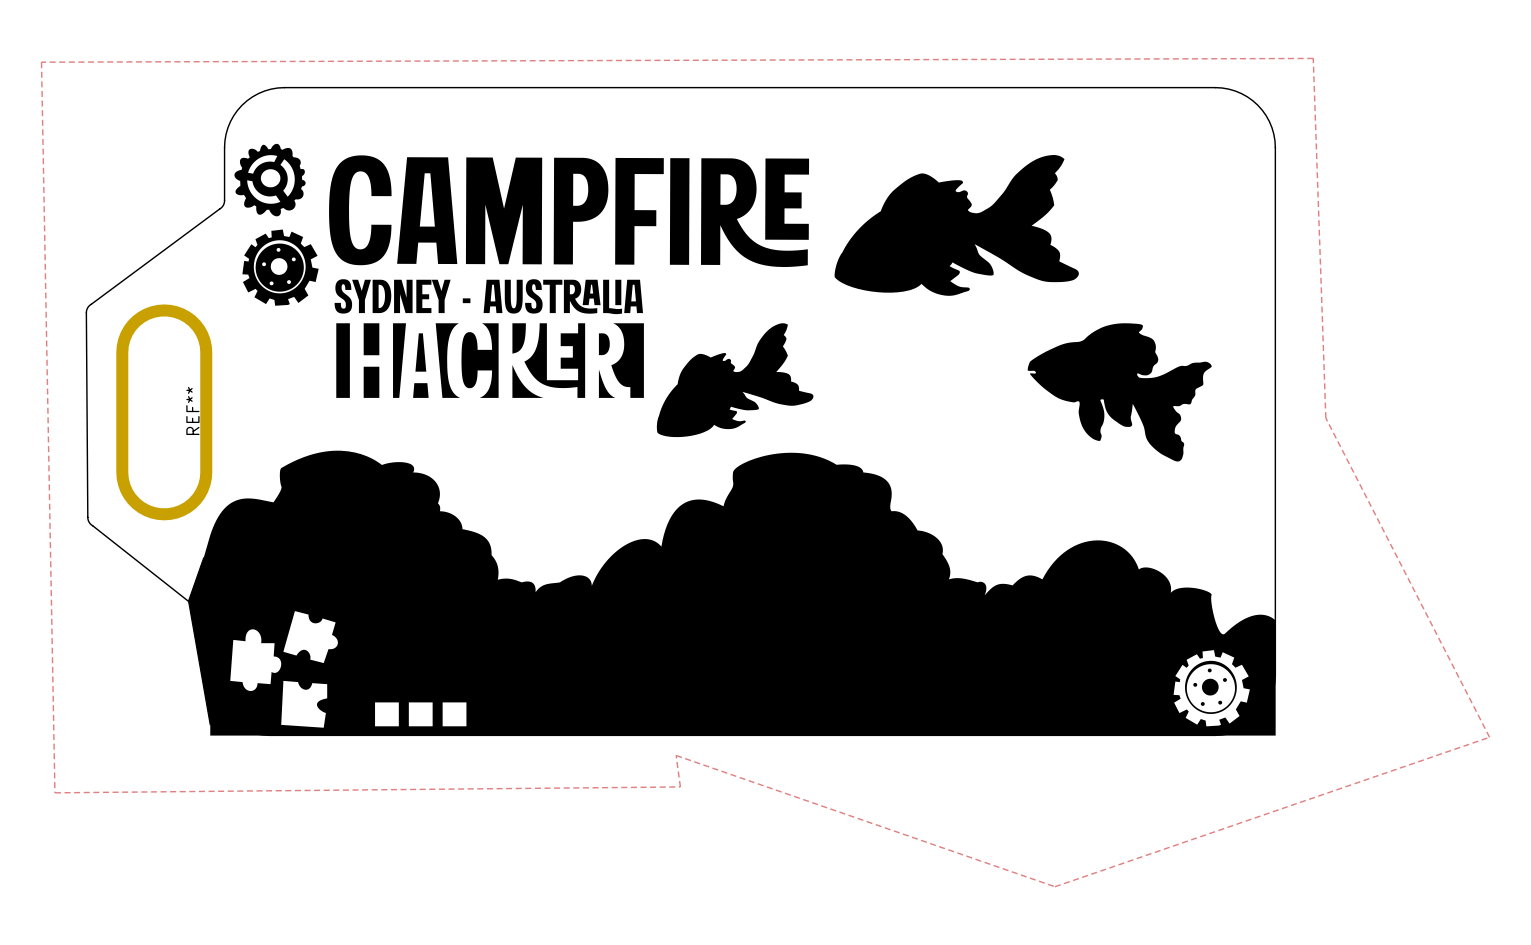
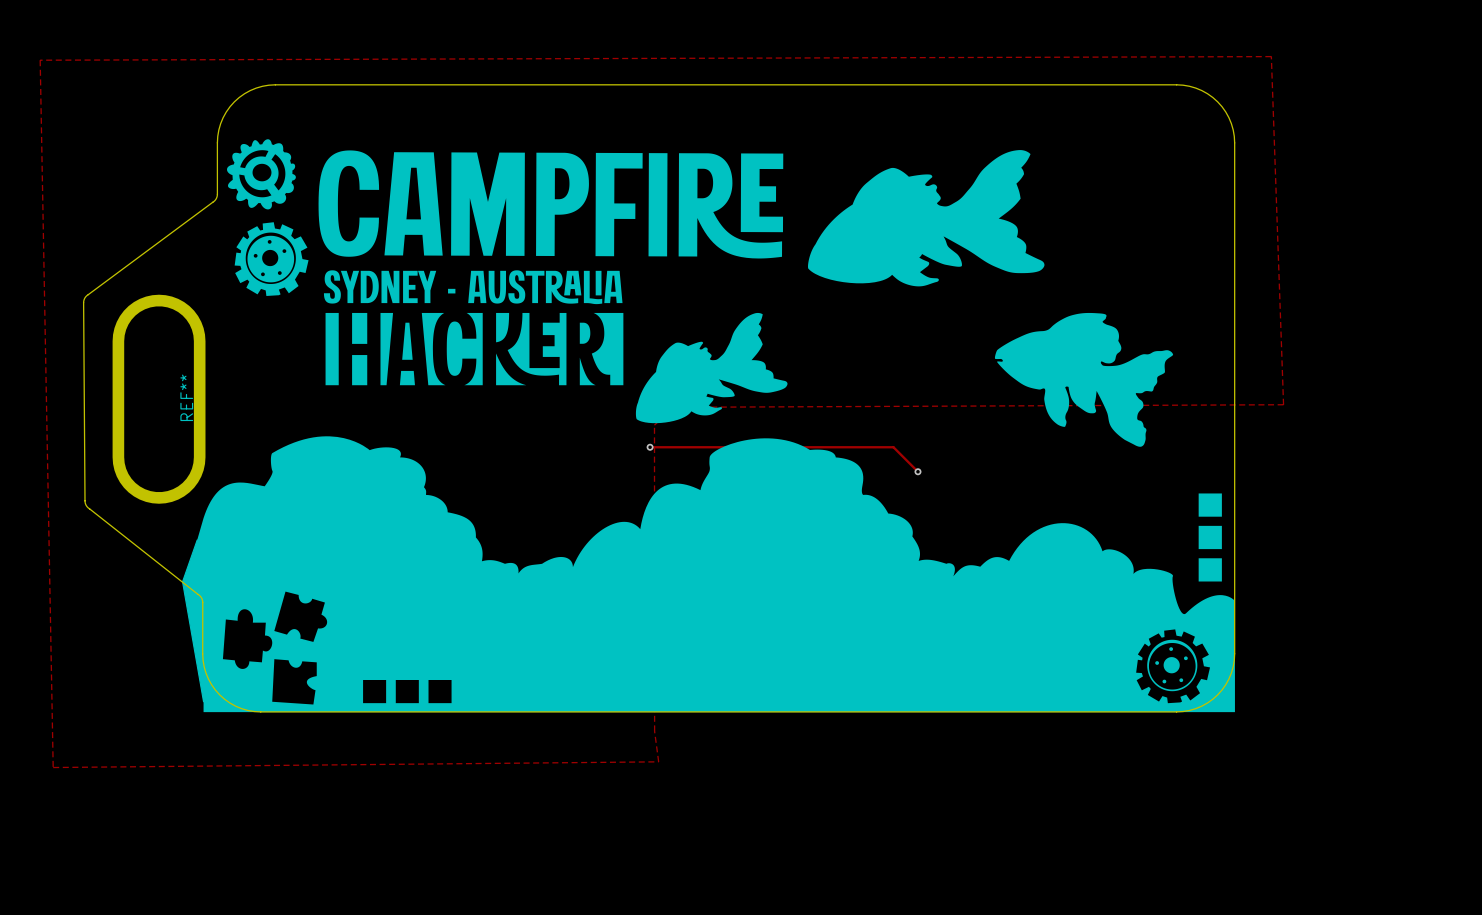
zone outline: (1325, 418) (1489, 737) (1054, 886) (676, 755) -> (1283, 404) (672, 407) (654, 425) (654, 731)
track: none -> (650, 447) (893, 447) (917, 471)
via: none -> (650, 447)
via: none -> (917, 471)
drawing: none -> [1198, 493, 1222, 582]

